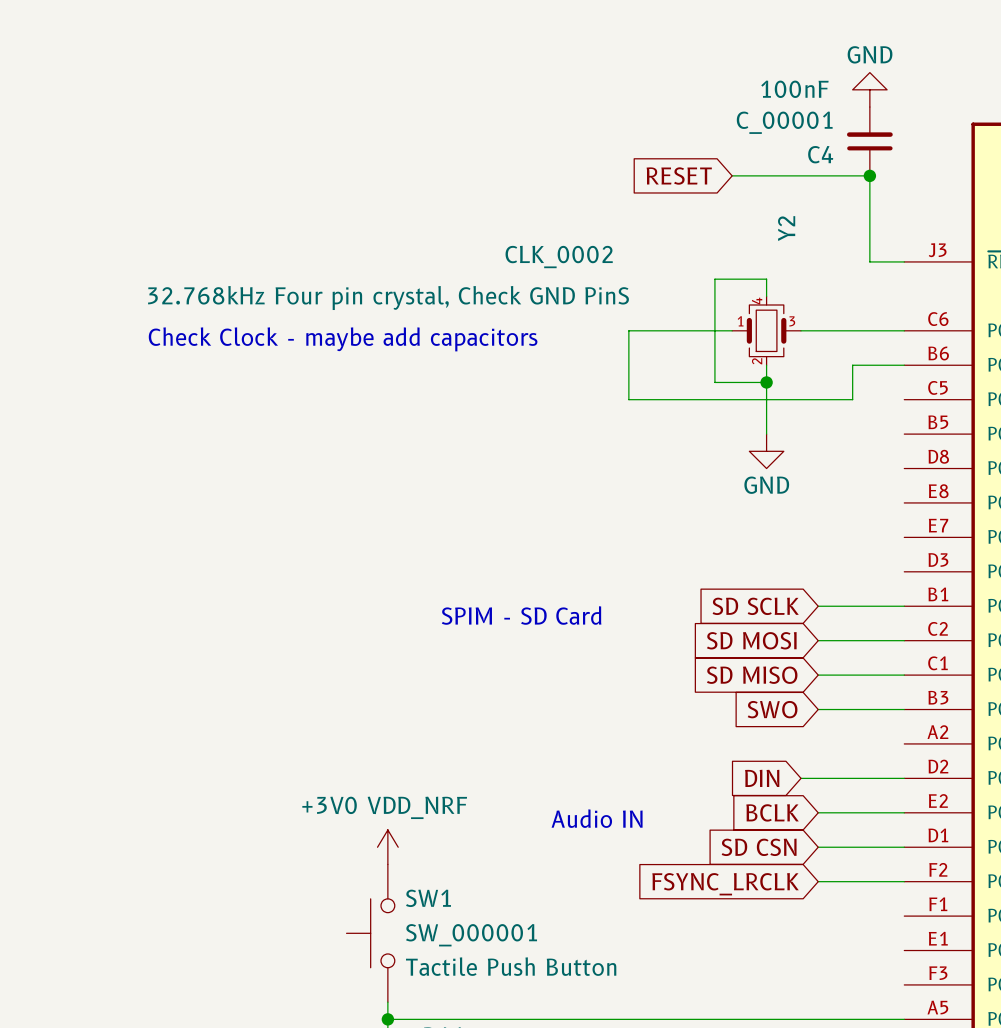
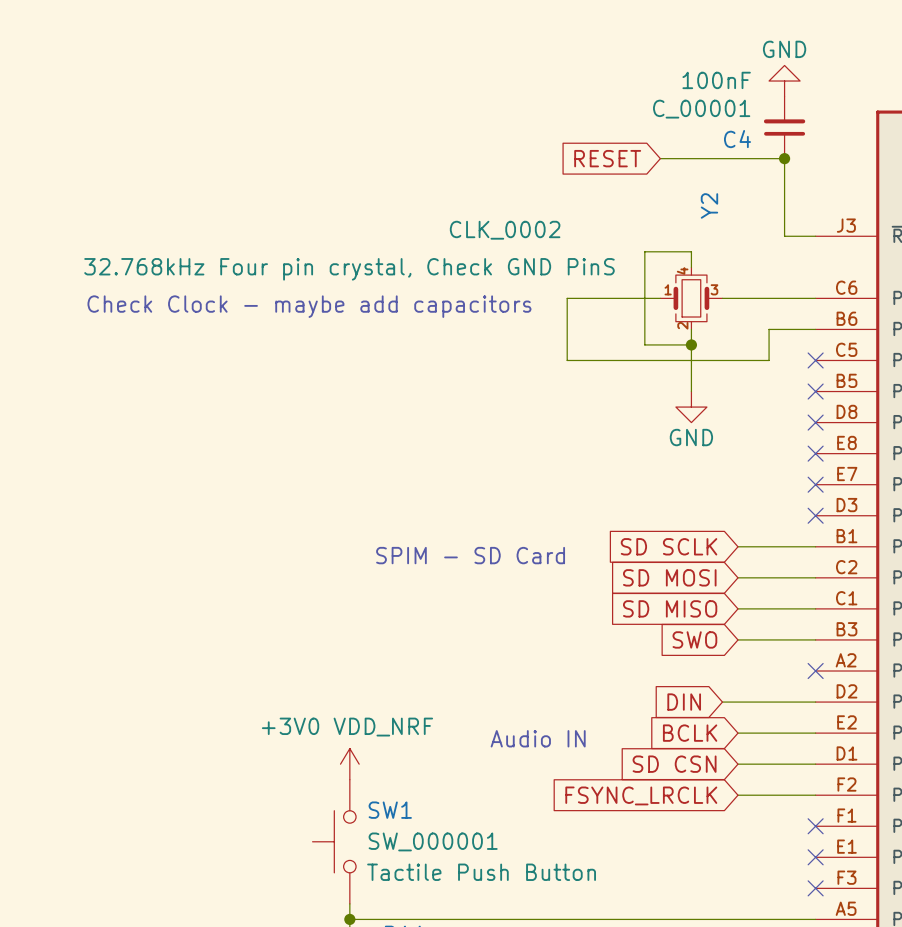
no-connect mark: none -> (815, 360)
no-connect mark: none -> (815, 391)
no-connect mark: none -> (815, 422)
no-connect mark: none -> (815, 453)
no-connect mark: none -> (815, 484)
no-connect mark: none -> (815, 515)
no-connect mark: none -> (815, 671)
no-connect mark: none -> (815, 826)
no-connect mark: none -> (815, 857)
no-connect mark: none -> (815, 888)

